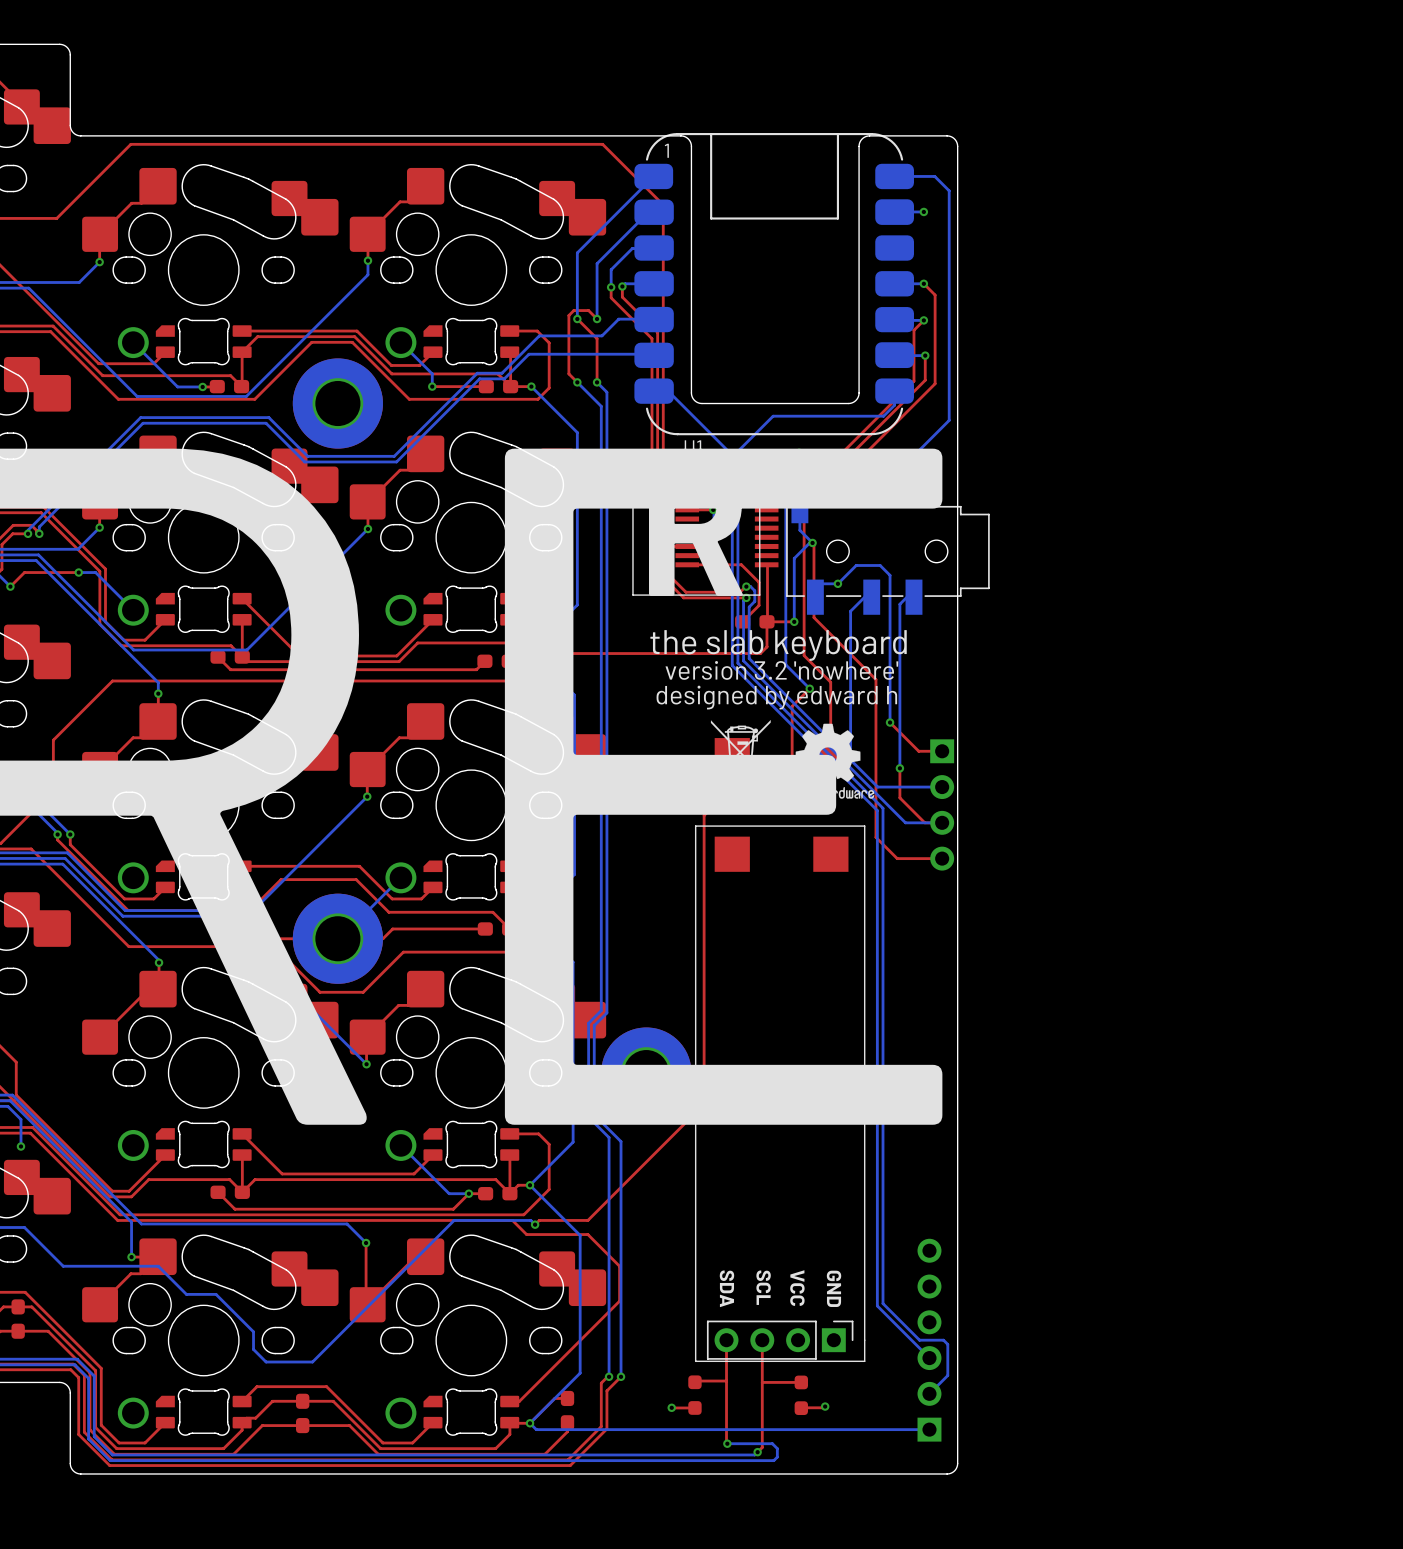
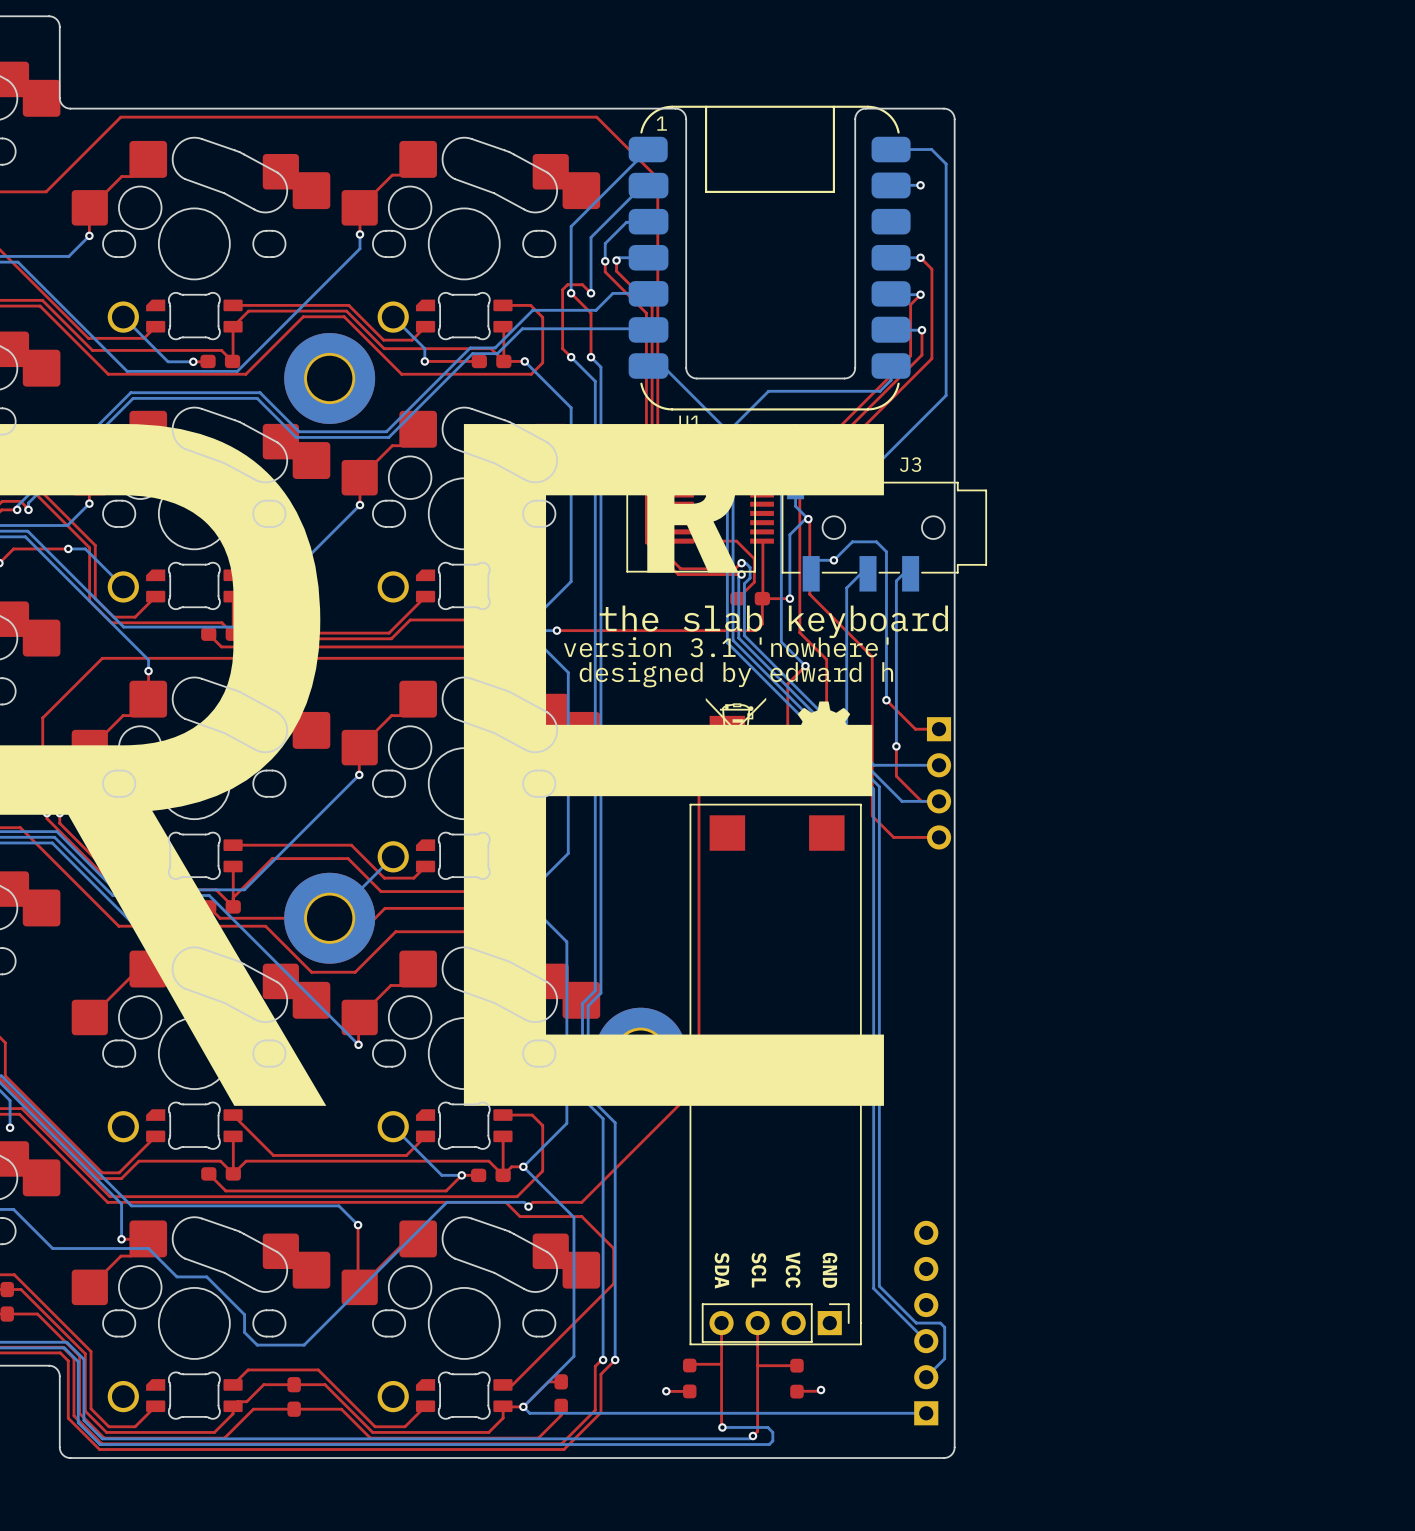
text: version 3.2 'nowhere' (781, 670) -> version 3.1 'nowhere' (726, 647)

